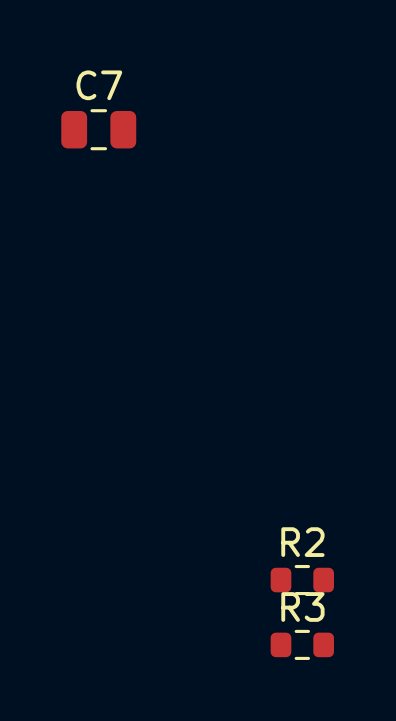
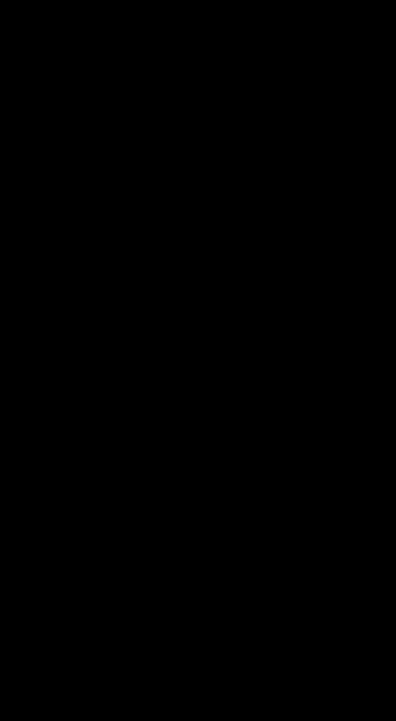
C7: (98, 129) -> none
R2: (302, 580) -> none
R3: (302, 644) -> none

